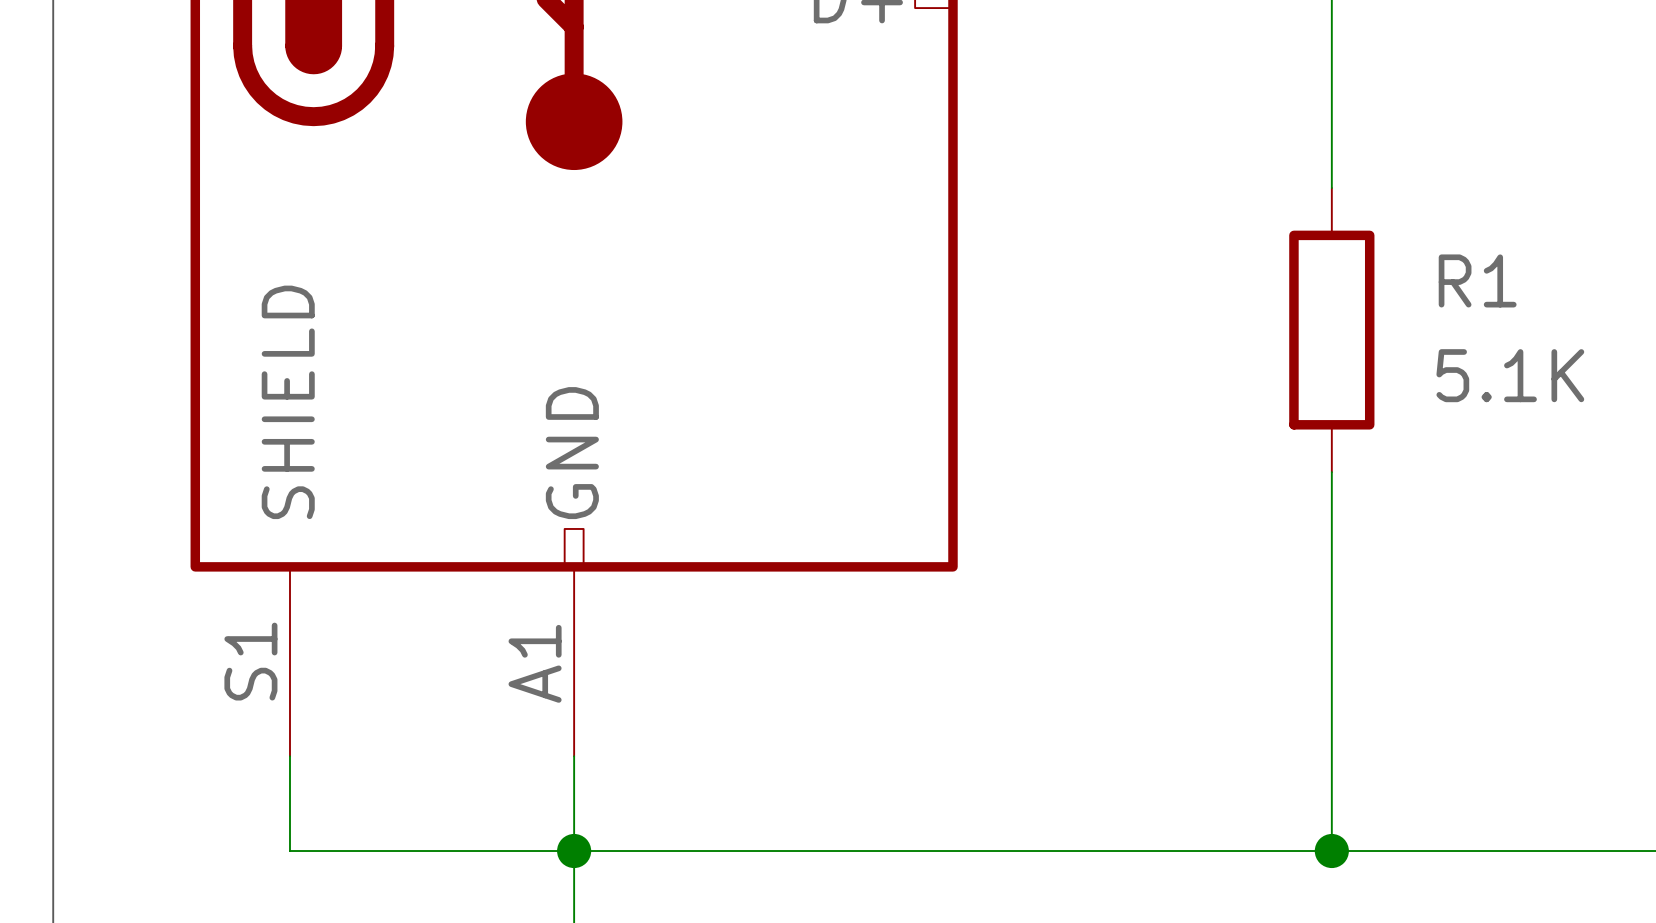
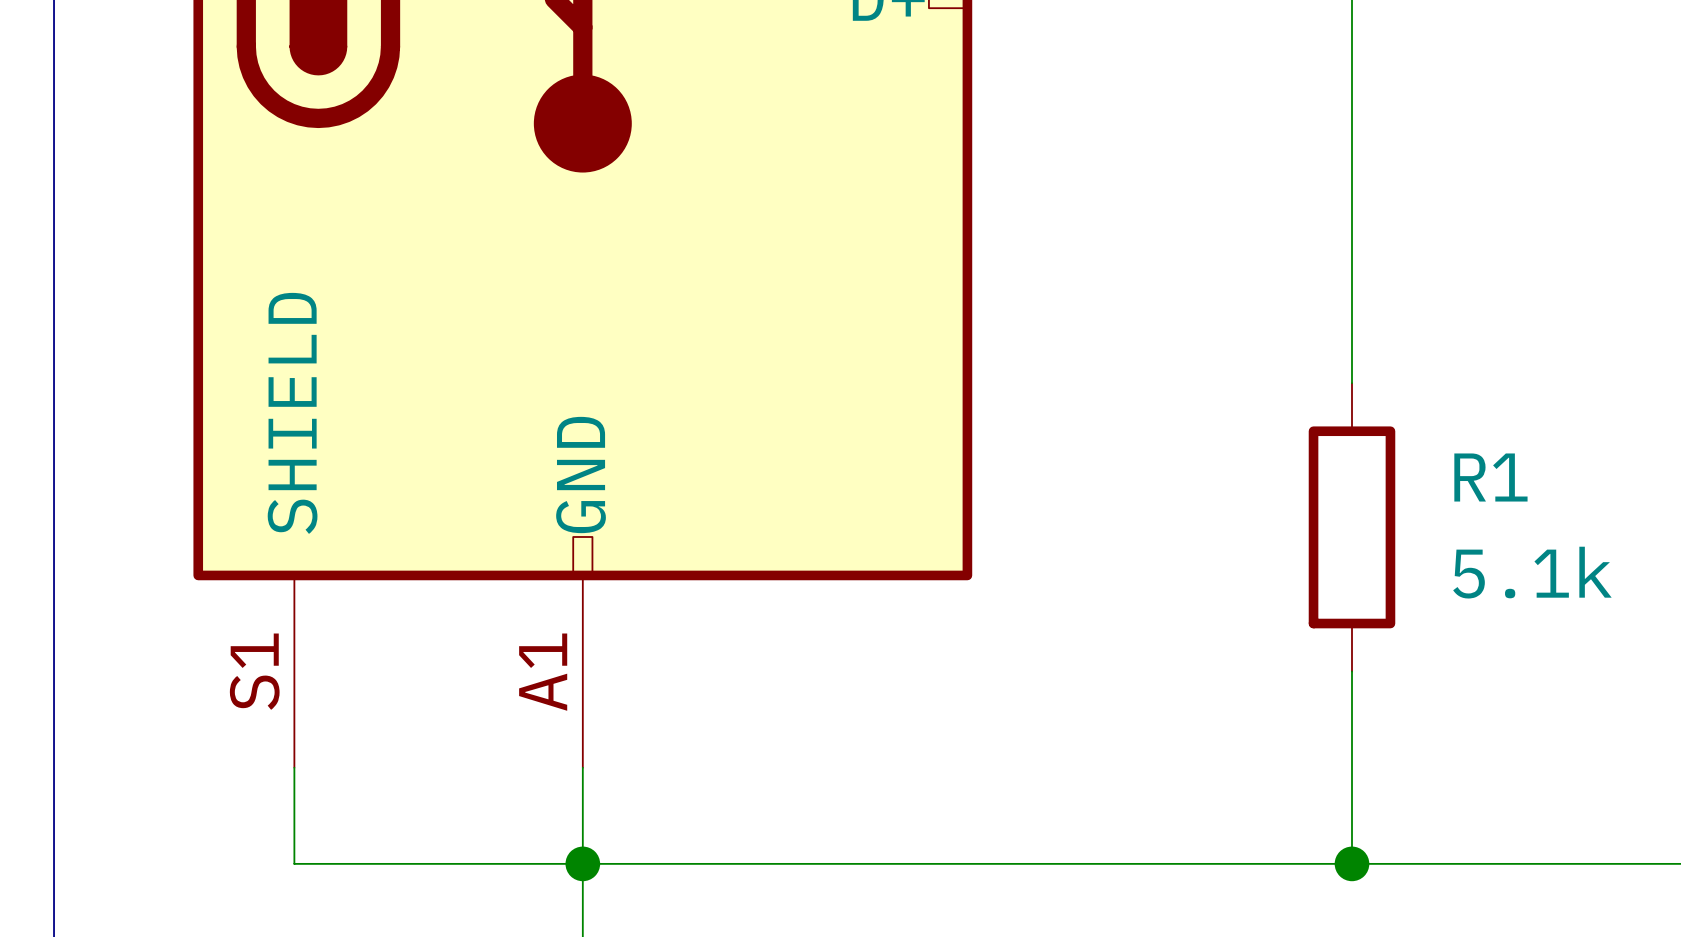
R1 position: (1331, 330) -> (1351, 527)
R1 value: 5.1K (1510, 375) -> 5.1k (1532, 572)
wire: (1331, 472) (1331, 661) -> (1351, 190) (1351, 383)

